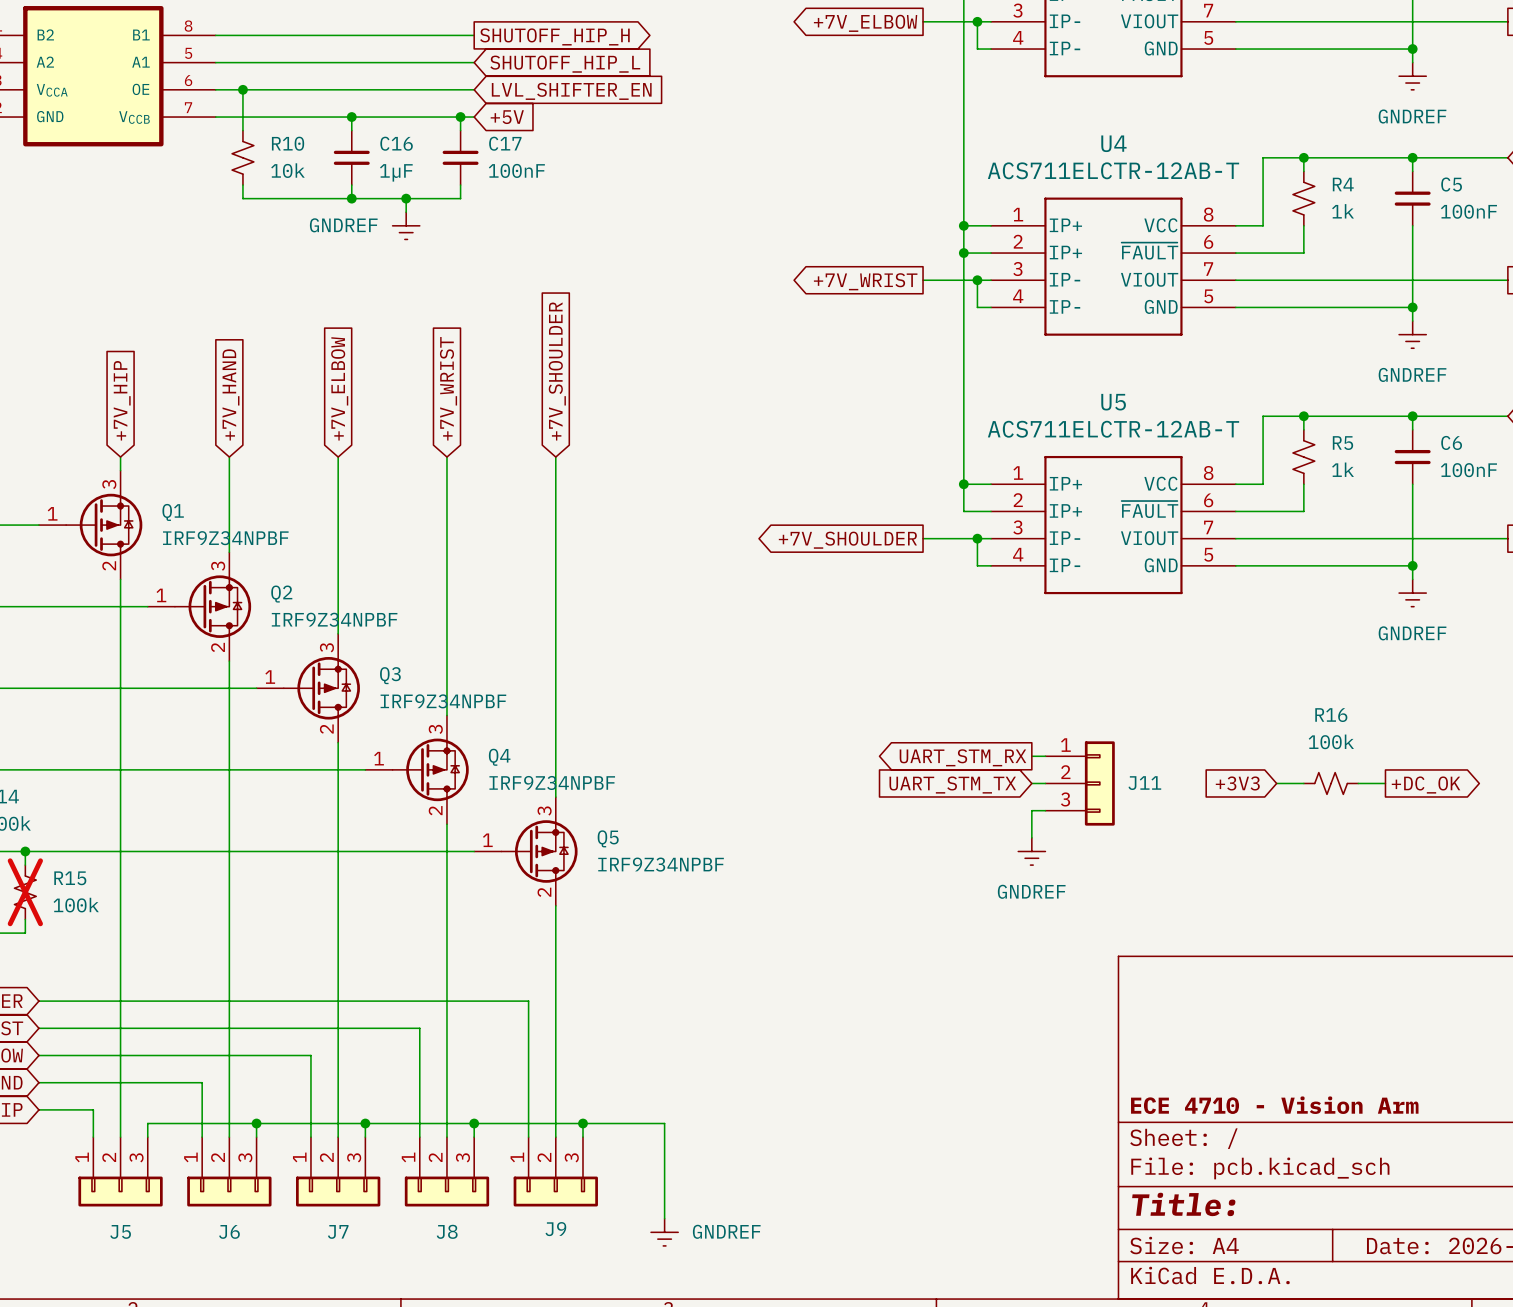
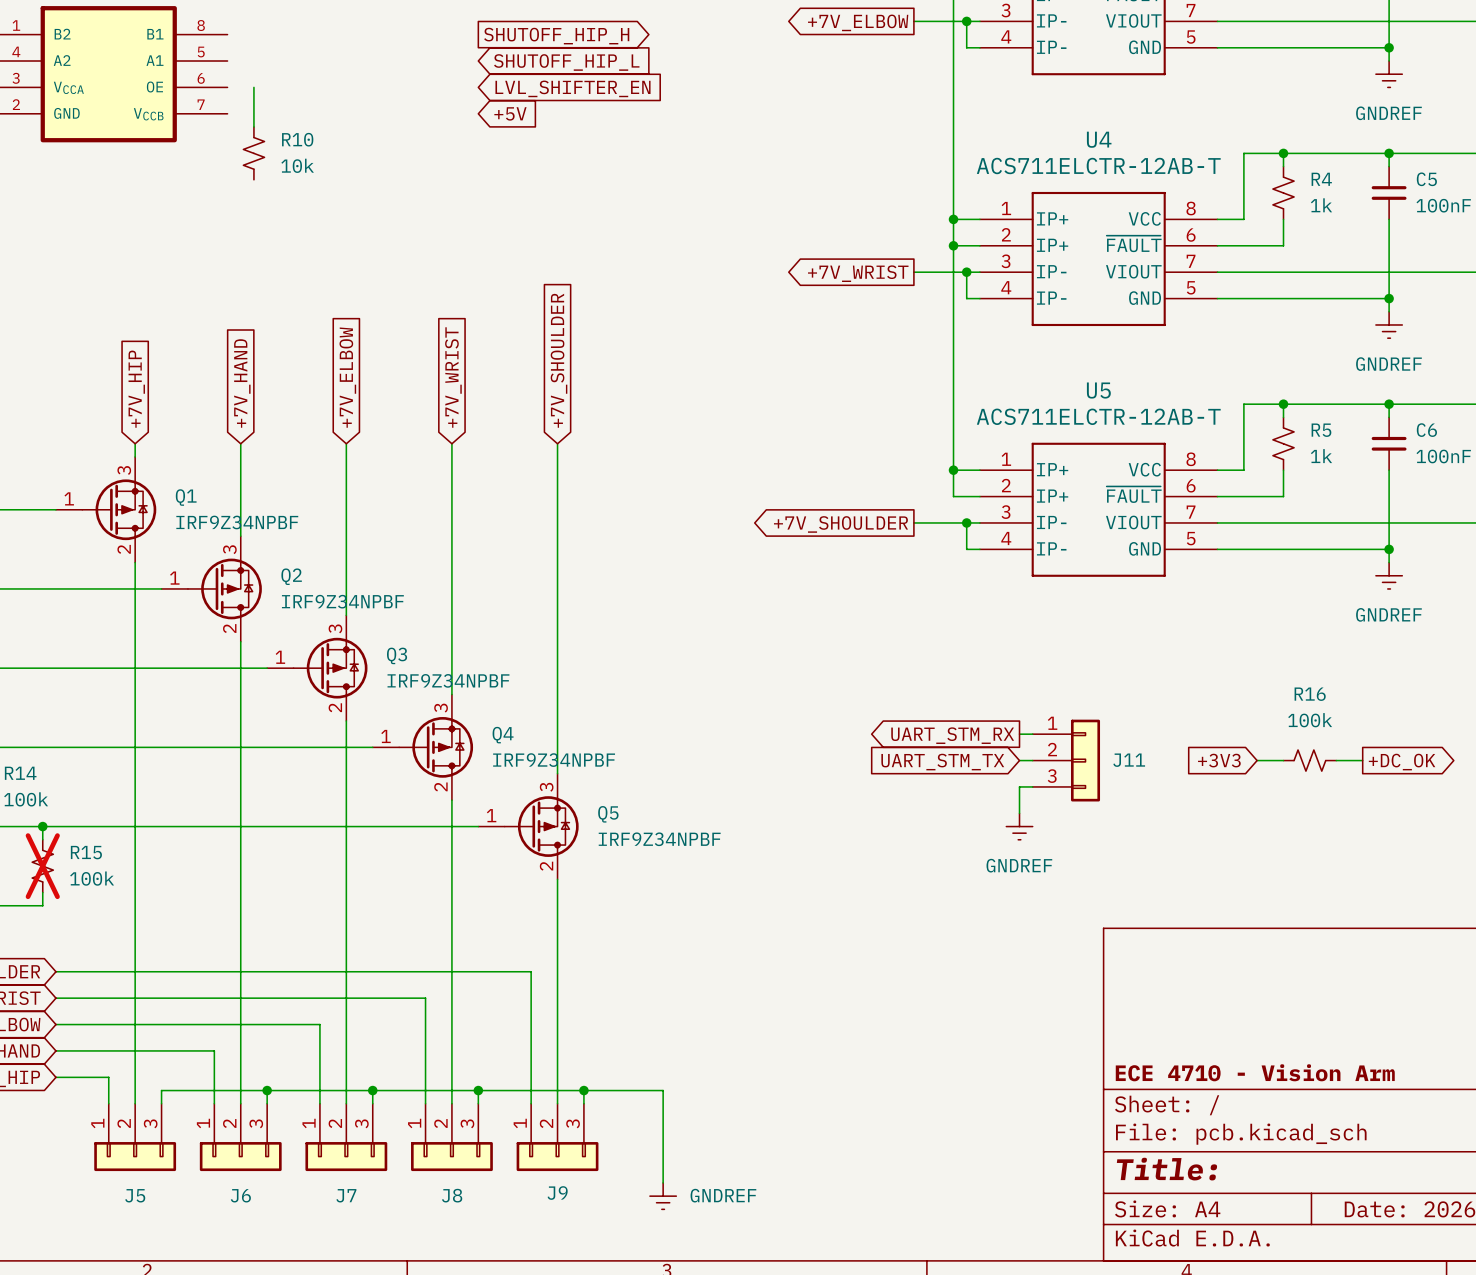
wire: (215, 35) (474, 35) -> none
wire: (215, 62) (474, 62) -> none
wire: (215, 89) (474, 89) -> none
junction: (242, 89) -> none
wire: (215, 117) (474, 117) -> none
wire: (351, 117) (351, 130) -> none
junction: (351, 117) -> none
wire: (460, 117) (460, 130) -> none
junction: (460, 117) -> none
C16: 1µF (351, 157) -> none
C17: 100nF (460, 157) -> none
wire: (242, 185) (242, 198) (460, 198) (460, 185) -> none
wire: (351, 185) (351, 198) -> none
junction: (351, 198) -> none
wire: (406, 198) (406, 212) -> none
junction: (406, 198) -> none
power symbol: GNDREF (406, 225) -> none

